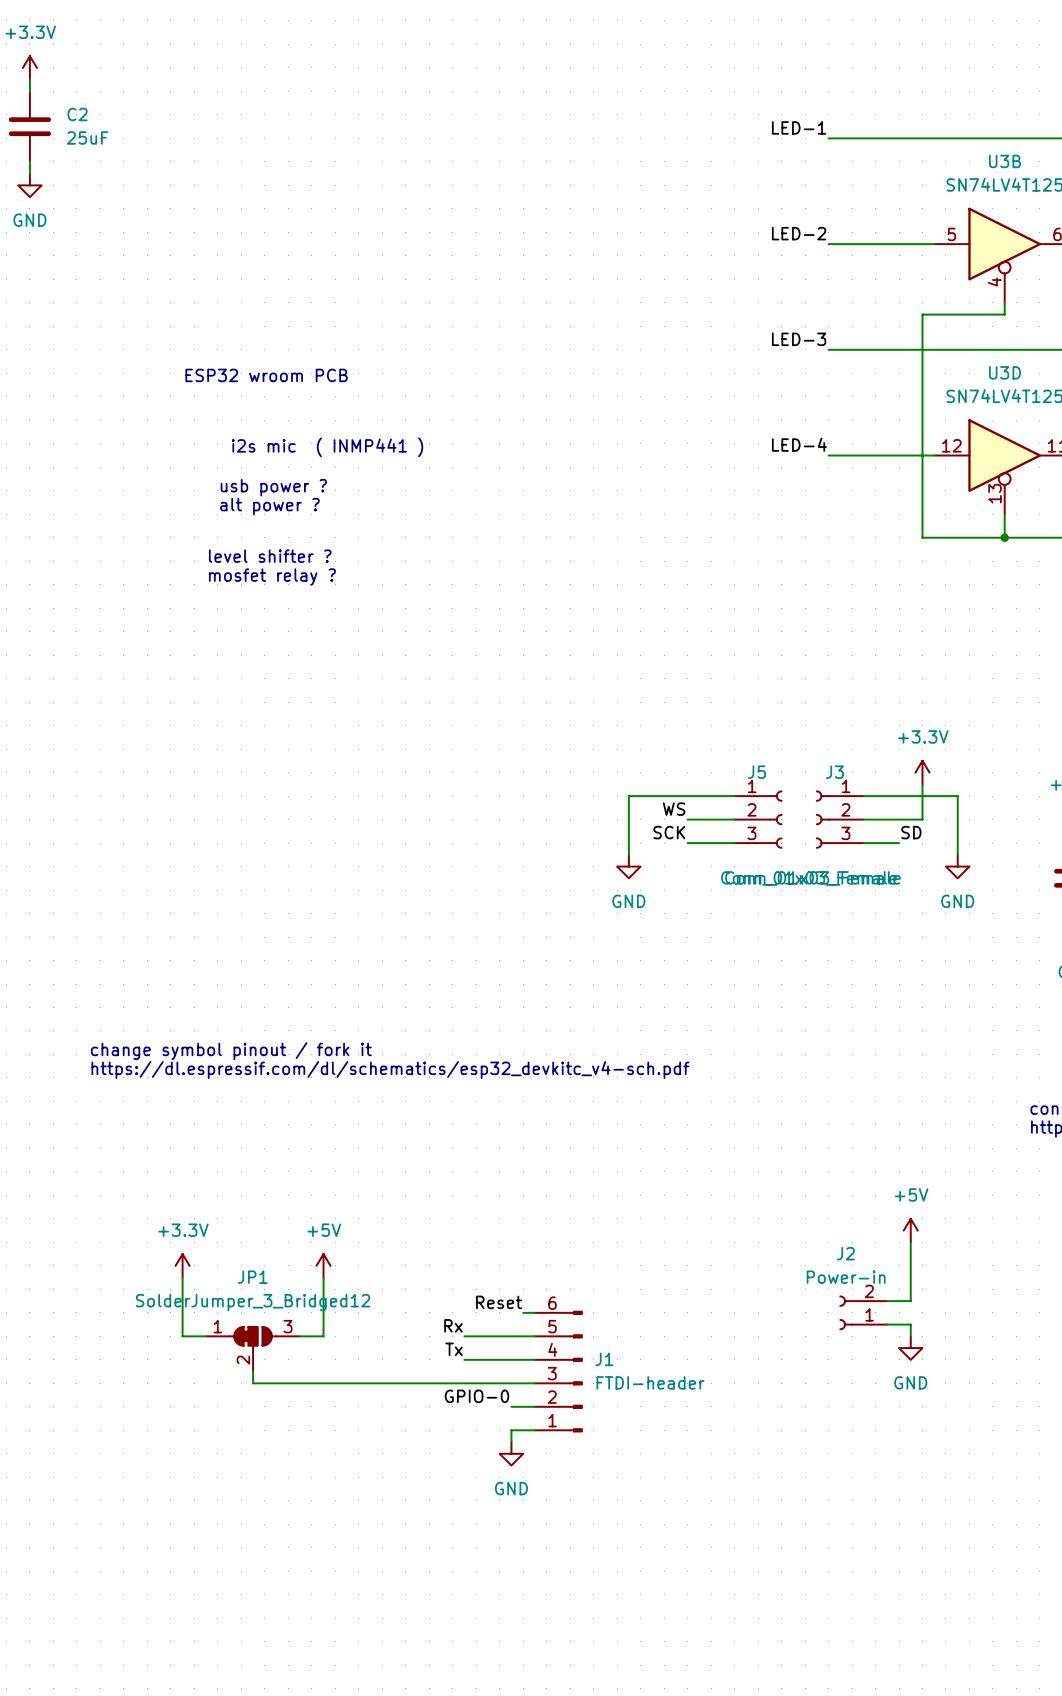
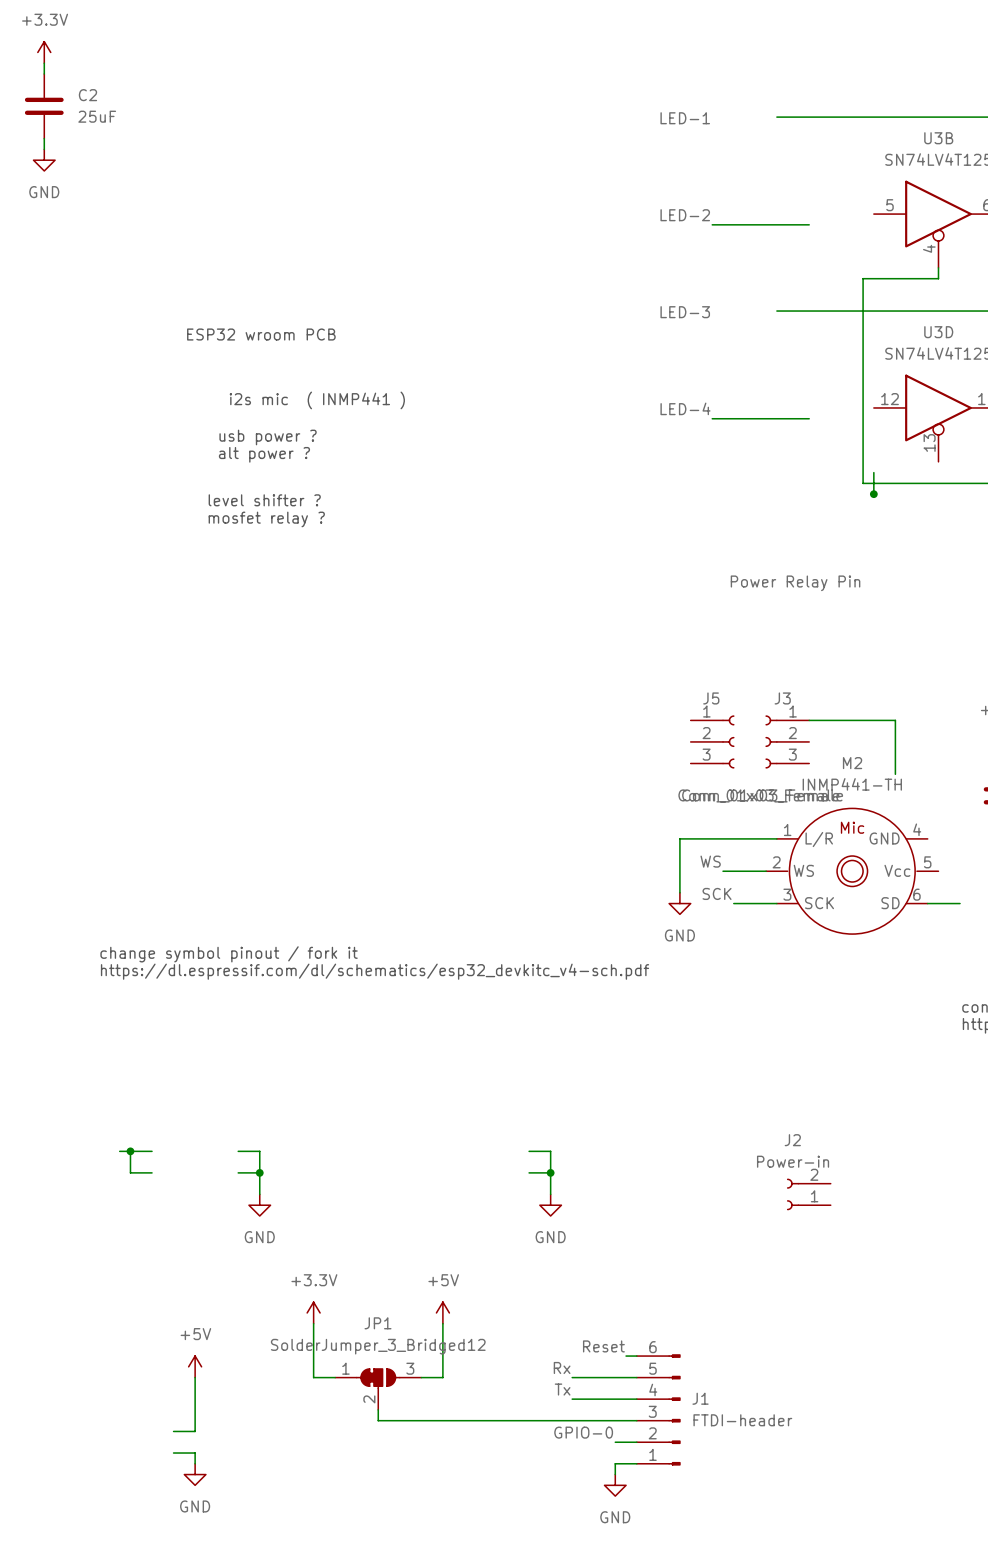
label position: LED-1 (799, 127) -> LED-1 (685, 118)
label position: LED-2 (799, 233) -> LED-2 (685, 215)
wire: (828, 244) (934, 244) -> (712, 224) (809, 224)
label position: LED-3 (799, 339) -> LED-3 (685, 312)
label position: LED-4 (799, 444) -> LED-4 (685, 408)
wire: (828, 455) (934, 455) -> (712, 418) (809, 418)
wire: (1004, 514) (1004, 537) -> (873, 472) (873, 494)
junction: (1004, 537) -> none
junction: none -> (873, 494)
label: none -> Power Relay Pin (795, 583)
power symbol: +3.3V (922, 772) -> none
wire: (922, 784) (922, 819) (863, 819) -> none
wire: (734, 796) (628, 796) (628, 854) -> (776, 838) (679, 838) (679, 892)
label position: WS (674, 809) -> WS (710, 861)
wire: (687, 819) (734, 819) -> (733, 903) (776, 903)
label position: SCK (669, 832) -> SCK (717, 893)
label: SD (911, 832) -> none
wire: (687, 843) (734, 843) -> (723, 871) (766, 871)
wire: (863, 843) (899, 843) -> (927, 903) (960, 903)
power symbol: GND (628, 866) -> none
power symbol: GND (957, 866) -> none
M2: none -> INMP441-TH (852, 871)
power symbol: none -> GND (679, 903)
power symbol: +5V (910, 1230) -> none
wire: (910, 1242) (910, 1301) (887, 1301) -> none
wire: none -> (119, 1151) (152, 1151)
wire: none -> (130, 1151) (130, 1172) (152, 1172)
junction: none -> (130, 1151)
power symbol position: +3.3V (182, 1265) -> +3.3V (313, 1312)
wire: none -> (238, 1151) (259, 1151) (259, 1194)
power symbol: +5V (323, 1265) -> none
wire: none -> (529, 1151) (550, 1151) (550, 1194)
wire: (182, 1277) (182, 1336) (206, 1336) -> (313, 1323) (313, 1377) (335, 1377)
wire: (323, 1277) (323, 1336) (300, 1336) -> (442, 1323) (442, 1377) (421, 1377)
wire: none -> (238, 1172) (259, 1172)
junction: none -> (259, 1172)
wire: none -> (529, 1172) (550, 1172)
junction: none -> (550, 1172)
label position: Reset (499, 1302) -> Reset (603, 1346)
wire: (523, 1312) (534, 1312) -> (626, 1356) (636, 1356)
power symbol: none -> GND (259, 1205)
power symbol: none -> GND (550, 1205)
wire: (887, 1324) (910, 1324) (910, 1336) -> none
label position: Rx (453, 1325) -> Rx (562, 1367)
wire: (464, 1336) (534, 1336) -> (572, 1377) (636, 1377)
power symbol: GND (910, 1348) -> none
JP1 position: (253, 1349) -> (378, 1389)
label position: Tx (454, 1349) -> Tx (562, 1389)
wire: (464, 1359) (534, 1359) -> (572, 1399) (636, 1399)
wire: (253, 1371) (253, 1383) (534, 1383) -> (378, 1409) (378, 1420) (636, 1420)
J1 position: (558, 1371) -> (658, 1409)
label position: GPIO-0 (476, 1396) -> GPIO-0 (583, 1432)
wire: (511, 1406) (534, 1406) -> (615, 1442) (636, 1442)
wire: (534, 1430) (511, 1430) (511, 1442) -> (636, 1463) (615, 1463) (615, 1474)
power symbol: none -> +5V (442, 1312)
power symbol: GND (511, 1453) -> none
power symbol: none -> +5V (195, 1366)
wire: none -> (195, 1377) (195, 1431) (173, 1431)
wire: none -> (173, 1453) (195, 1453) (195, 1463)
power symbol: none -> GND (195, 1474)
power symbol: none -> GND (615, 1485)

